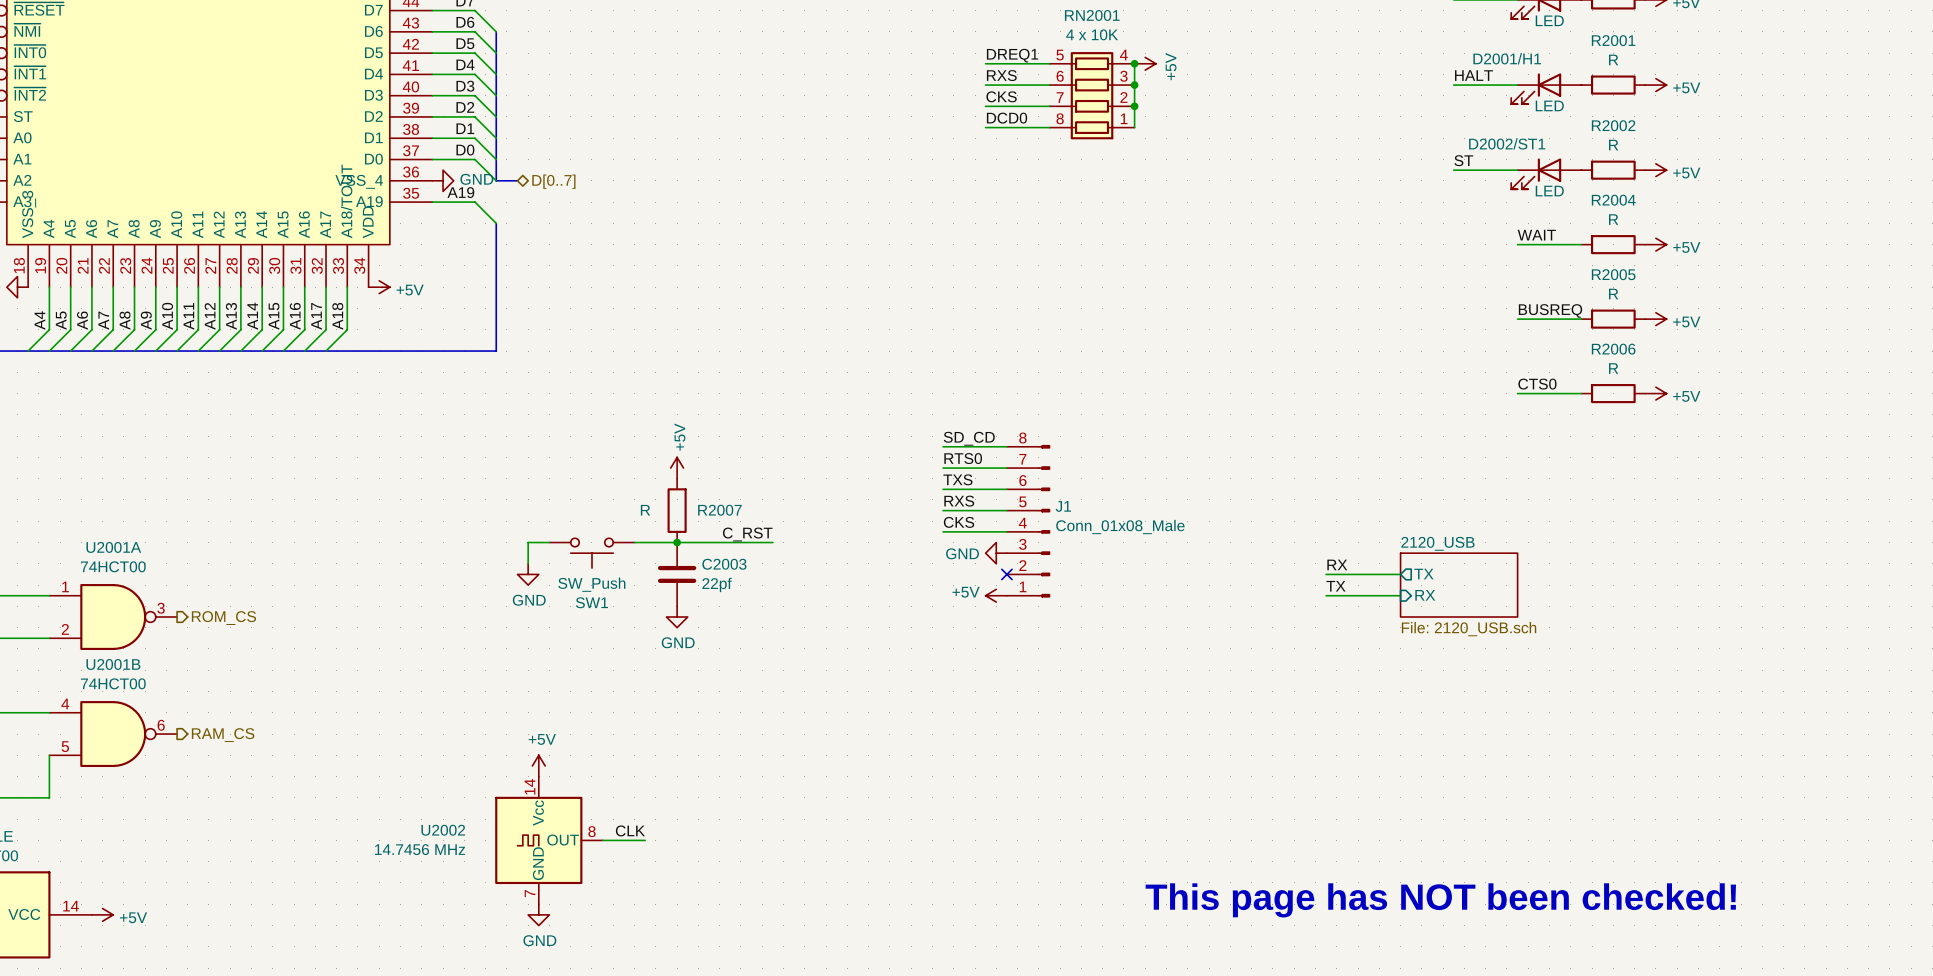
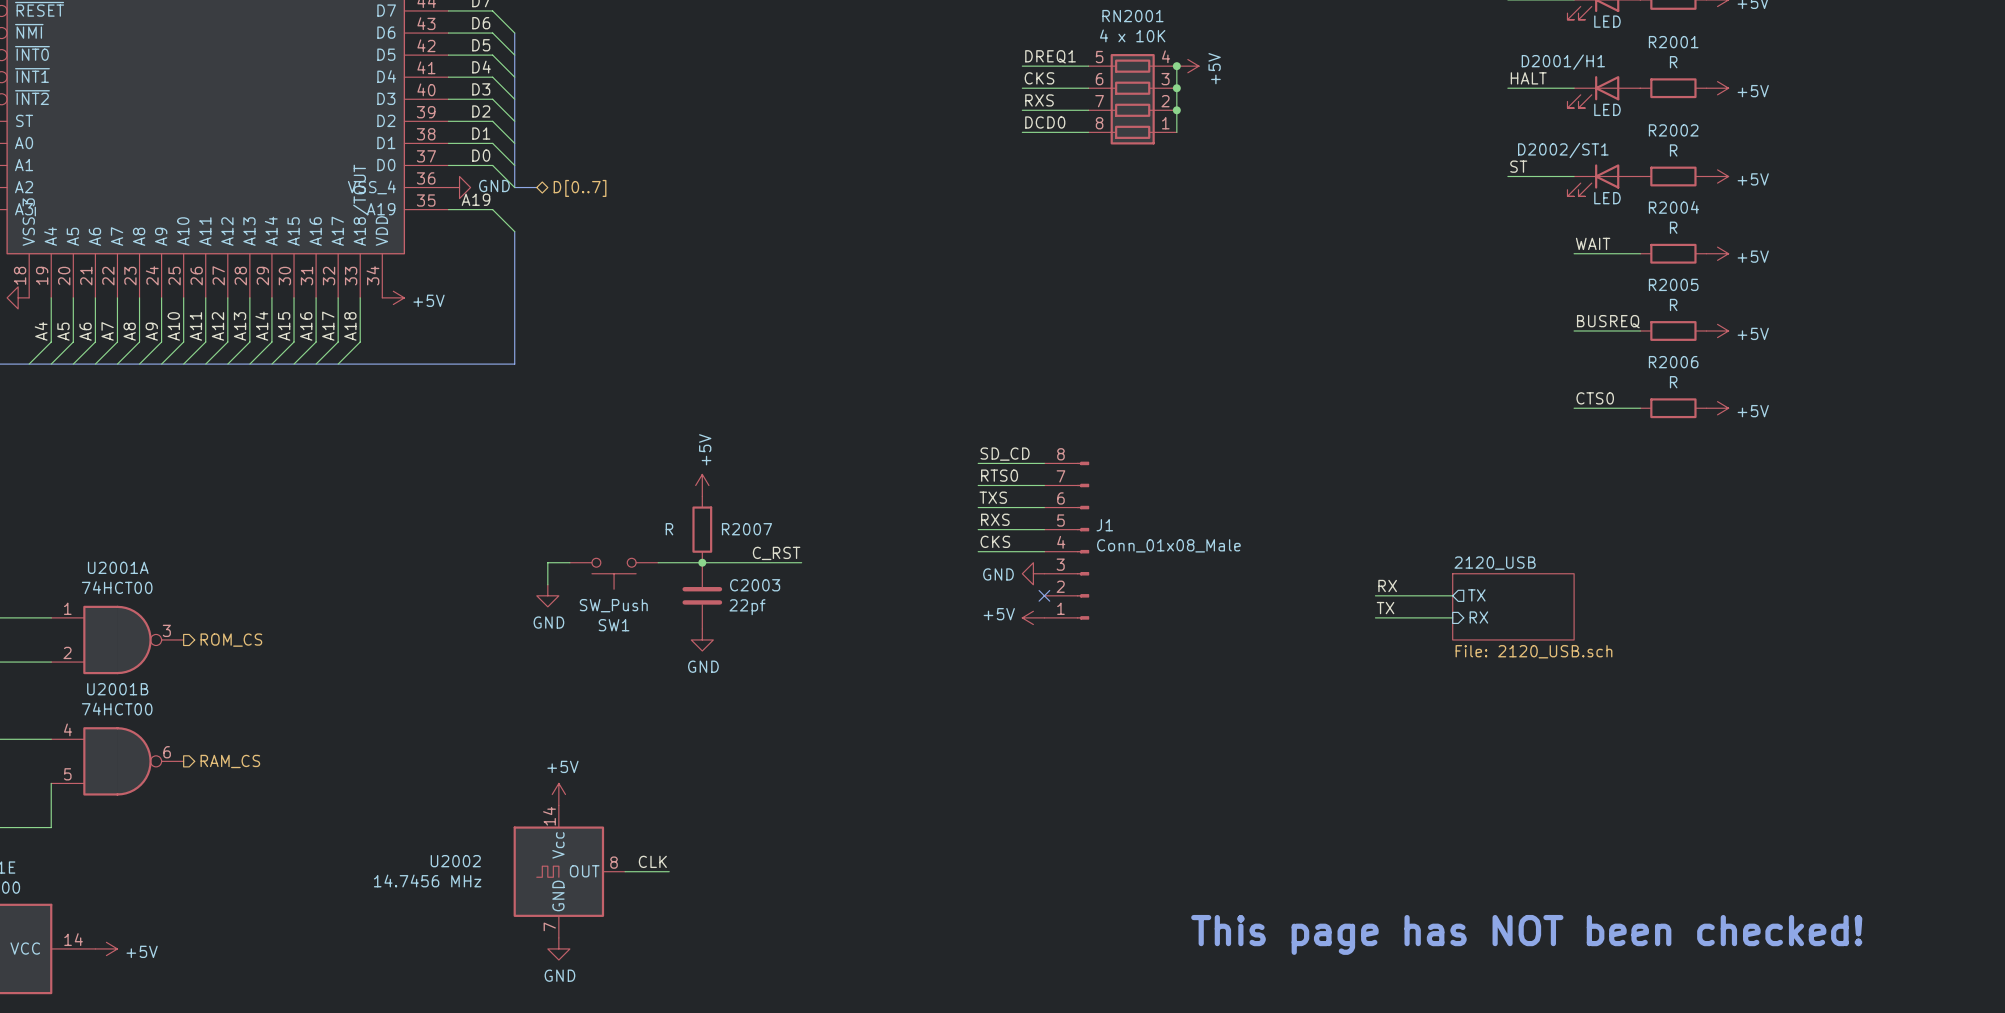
label: RXS (1001, 75) -> CKS (1039, 78)
label: CKS (1001, 96) -> RXS (1039, 100)

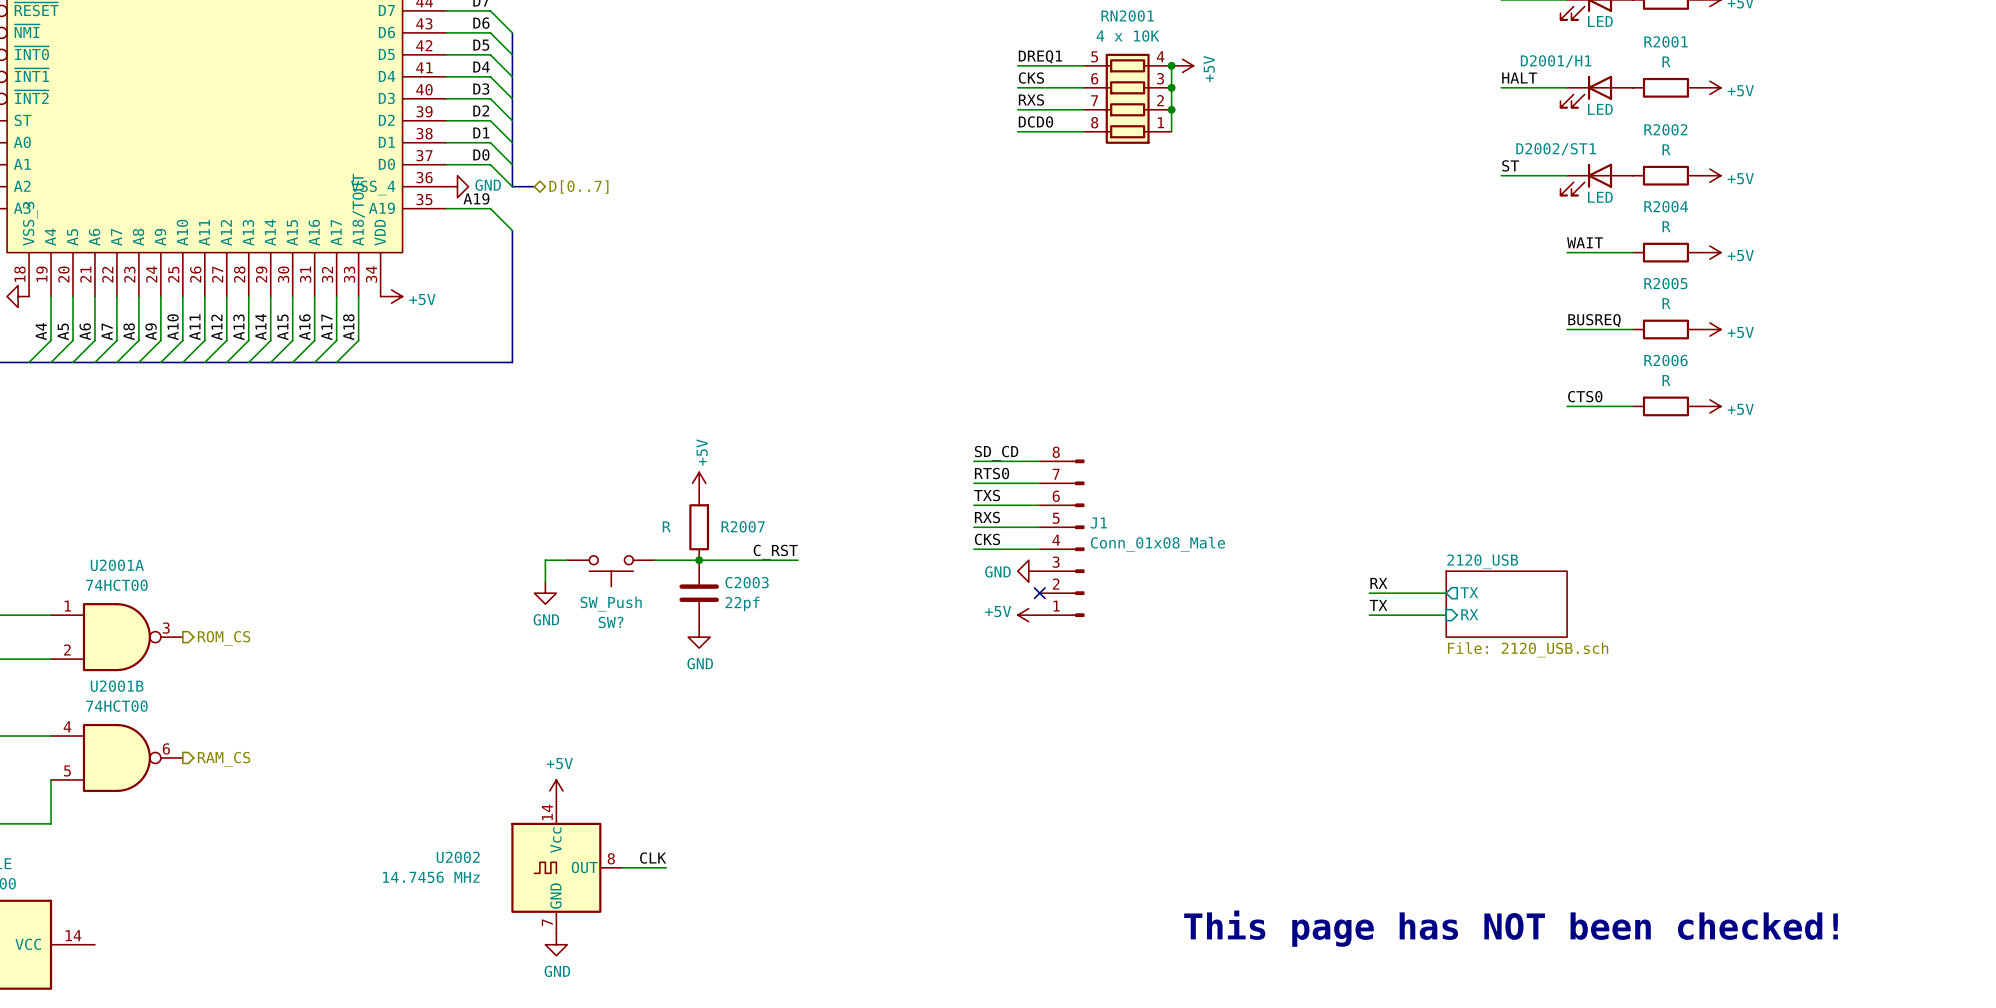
SW1 name: SW1 (614, 625) -> SW? (611, 622)
power symbol: +5V (106, 948) -> none

